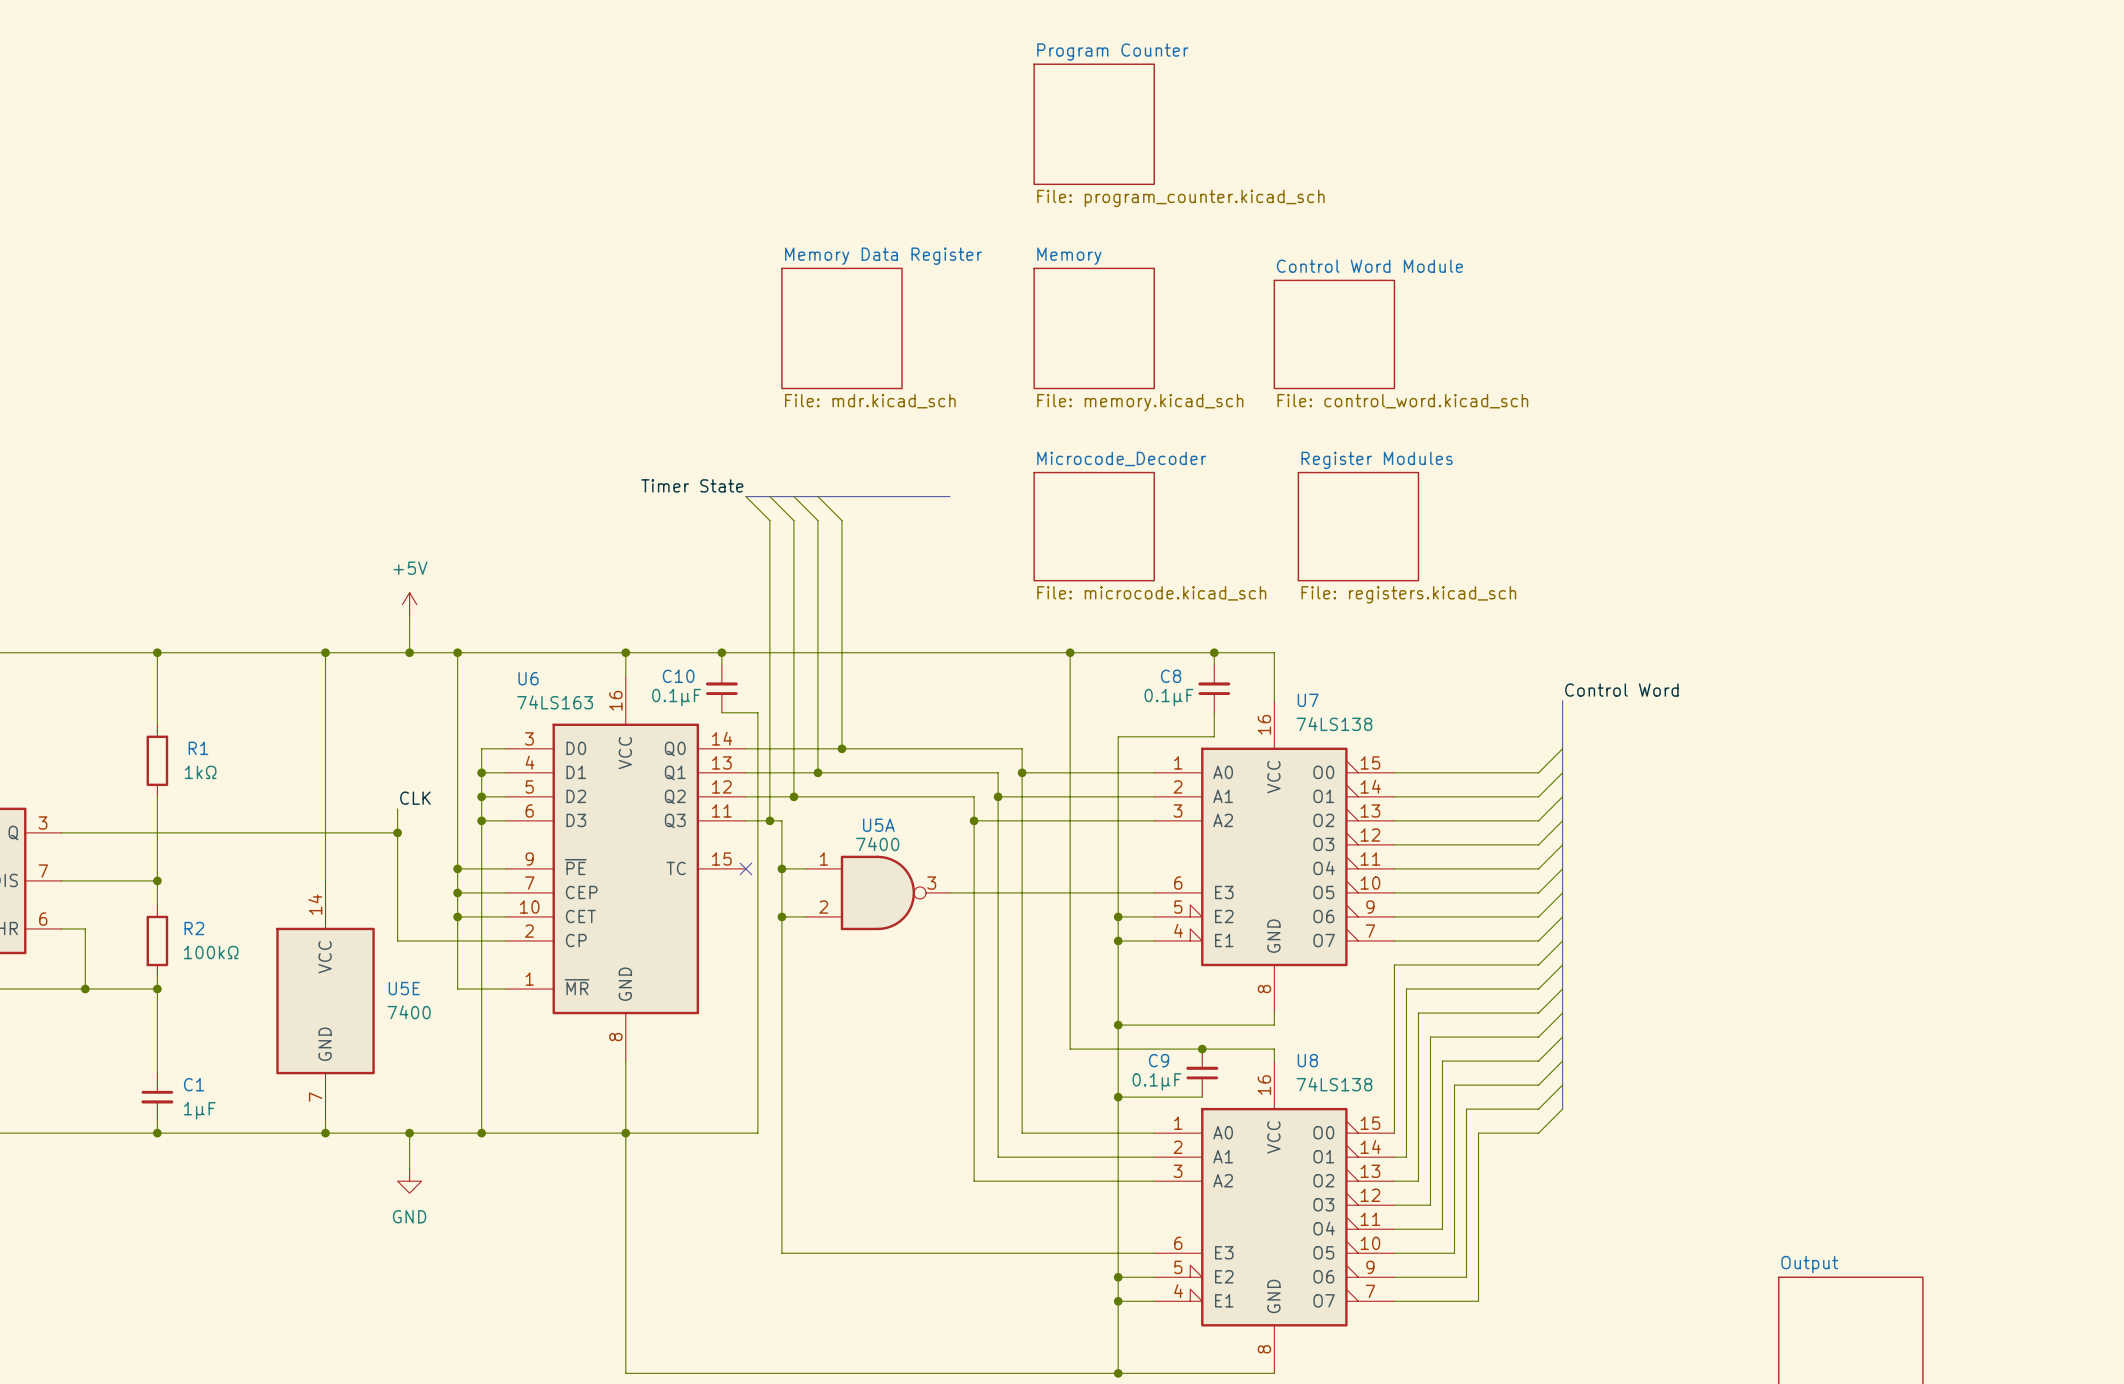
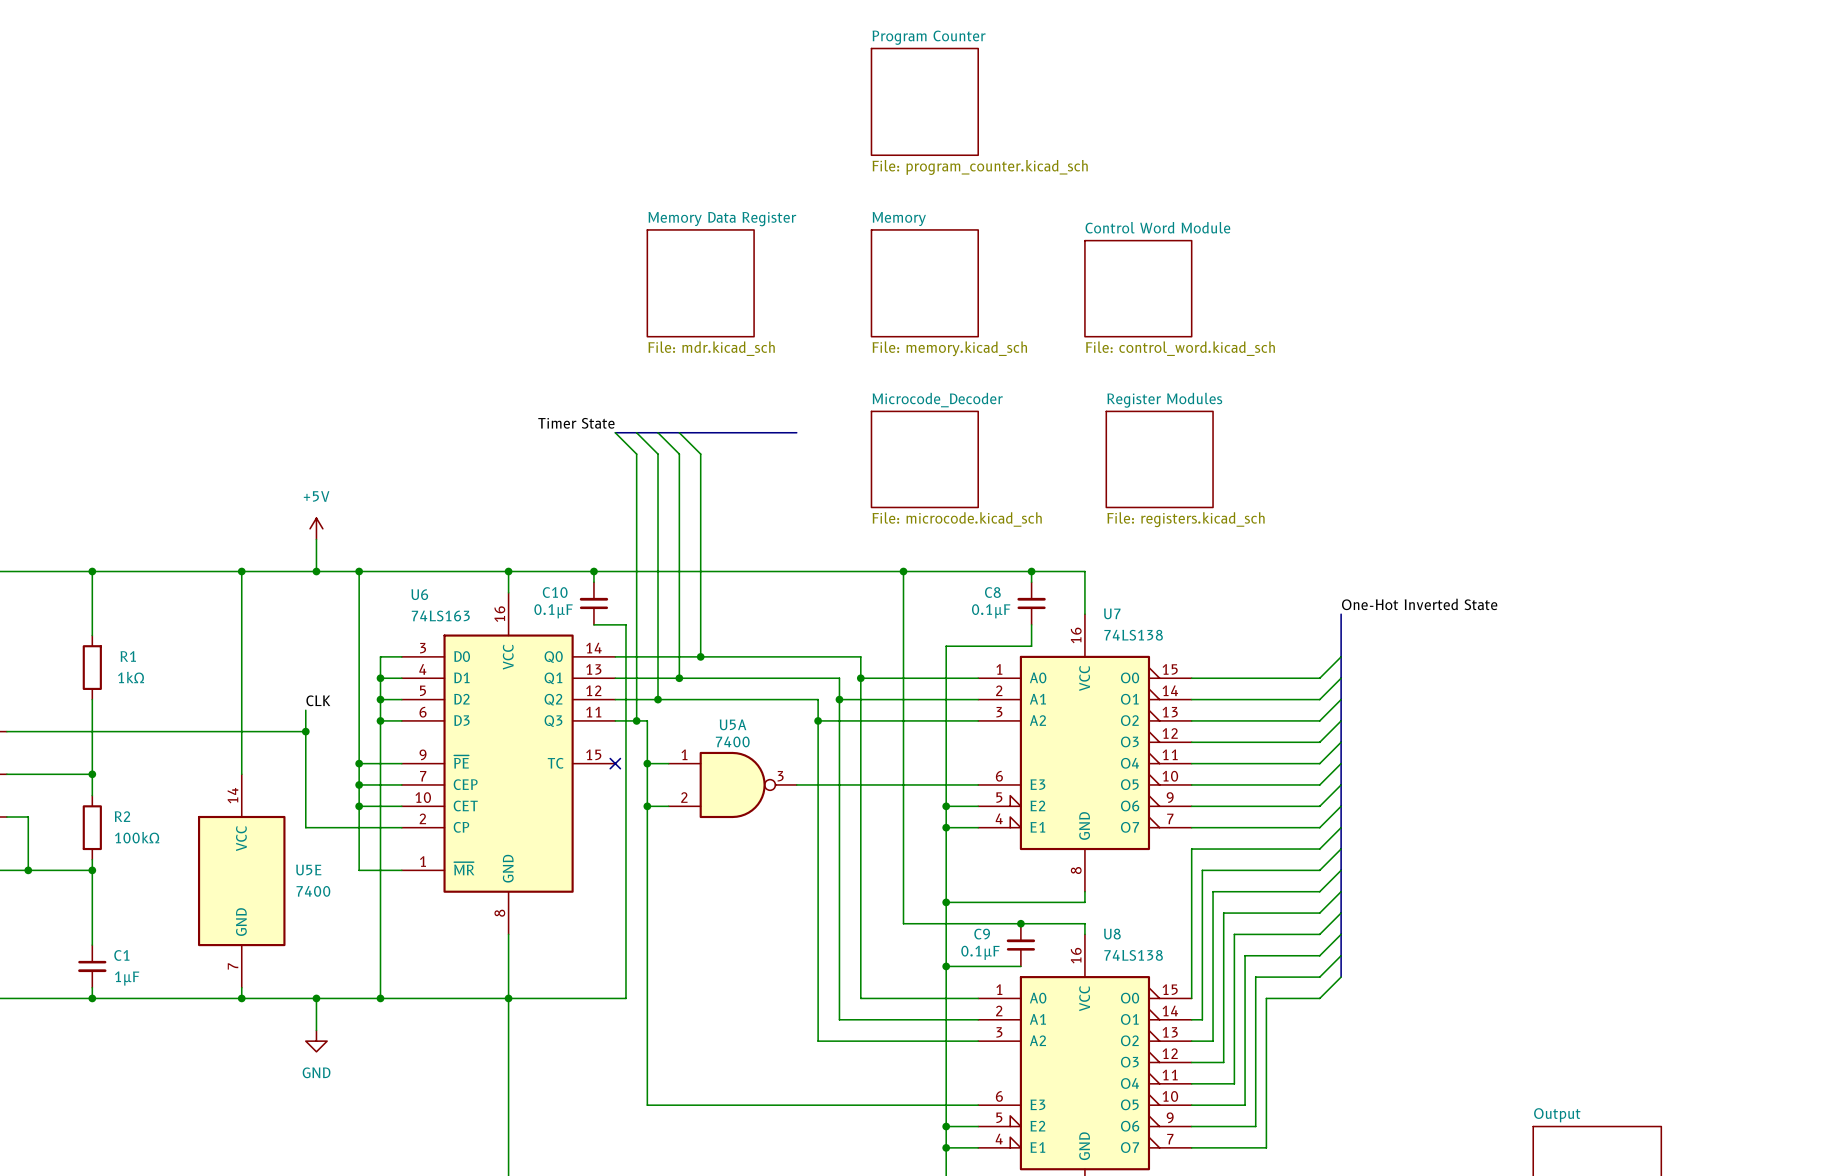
label: Control Word (1621, 690) -> One-Hot Inverted State (1419, 604)

